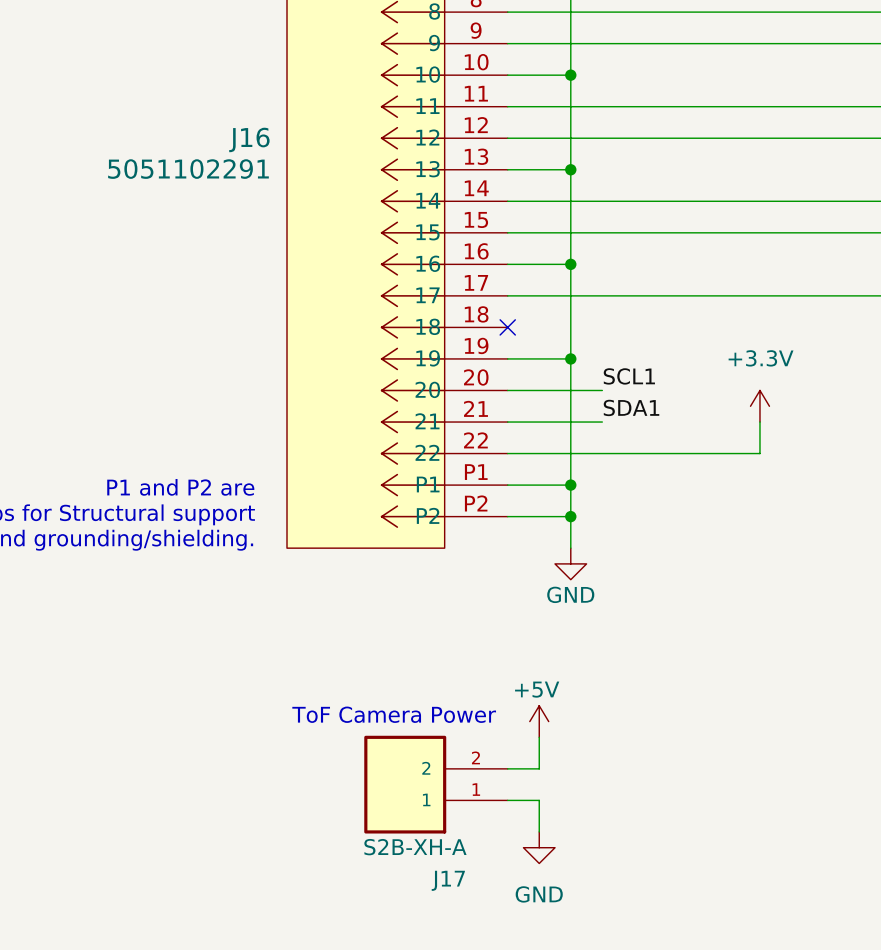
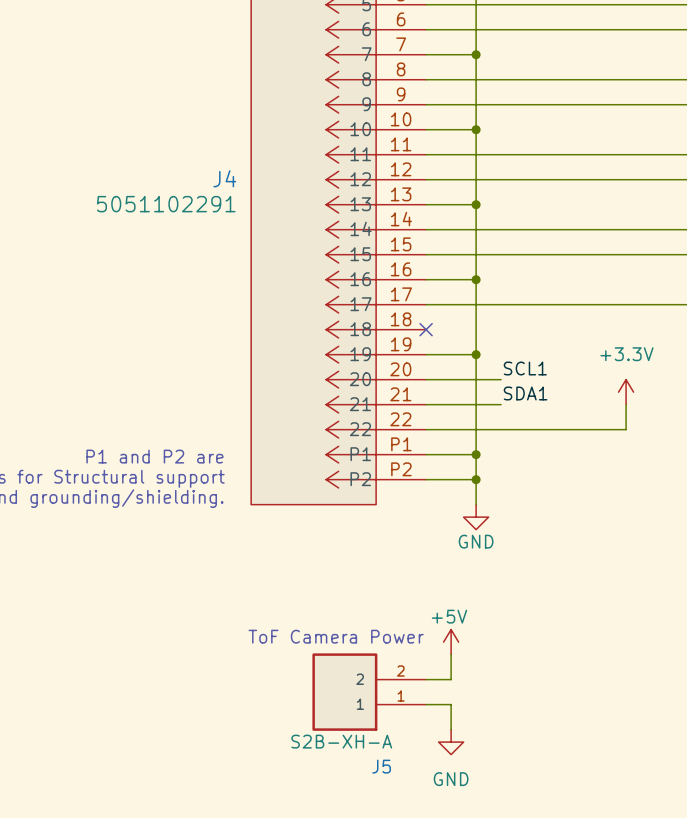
J16 name: J16 (249, 139) -> J4 (224, 178)
J17 name: J17 (448, 880) -> J5 (381, 766)

